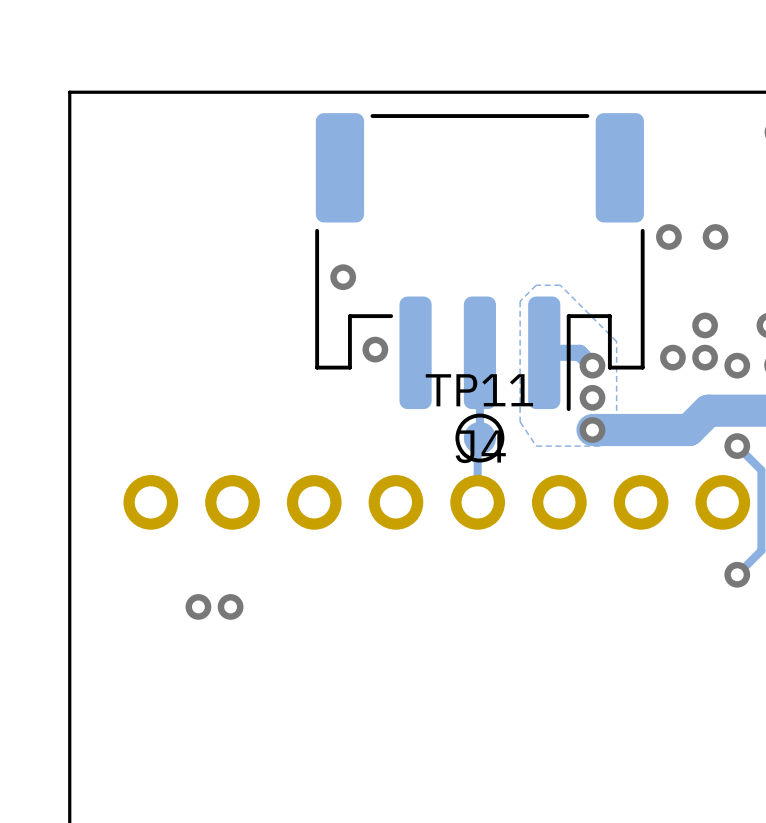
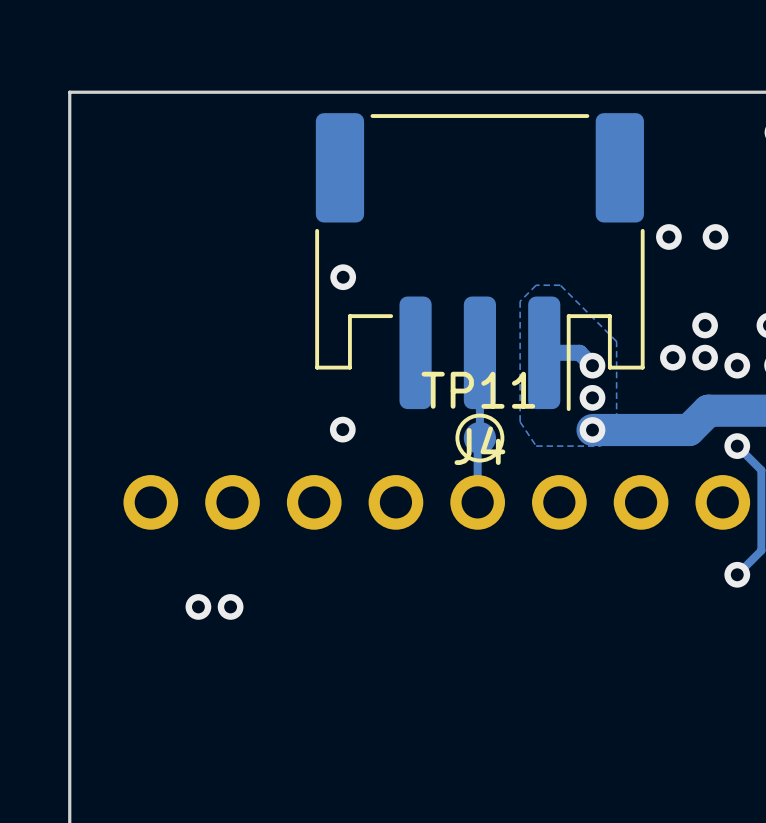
via position: (375, 349) -> (342, 429)

